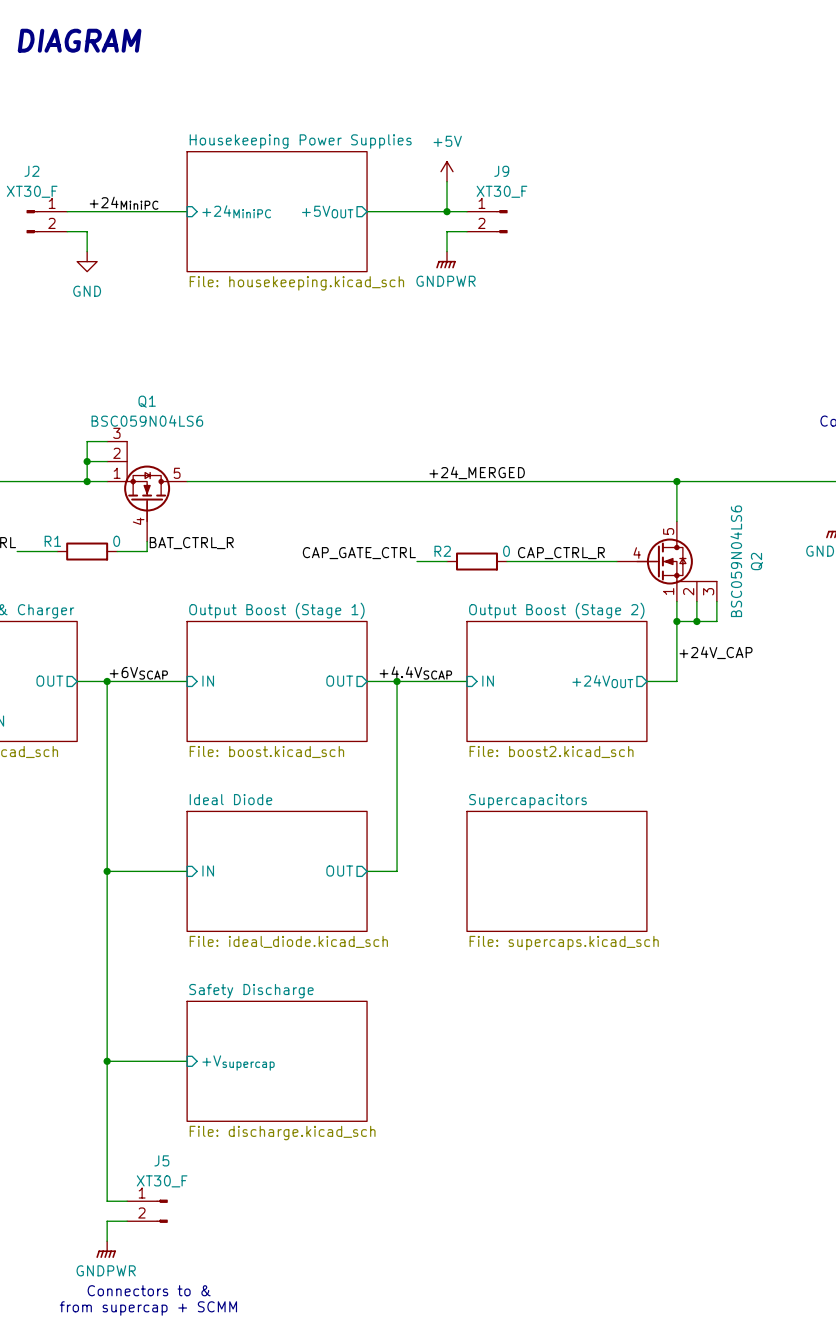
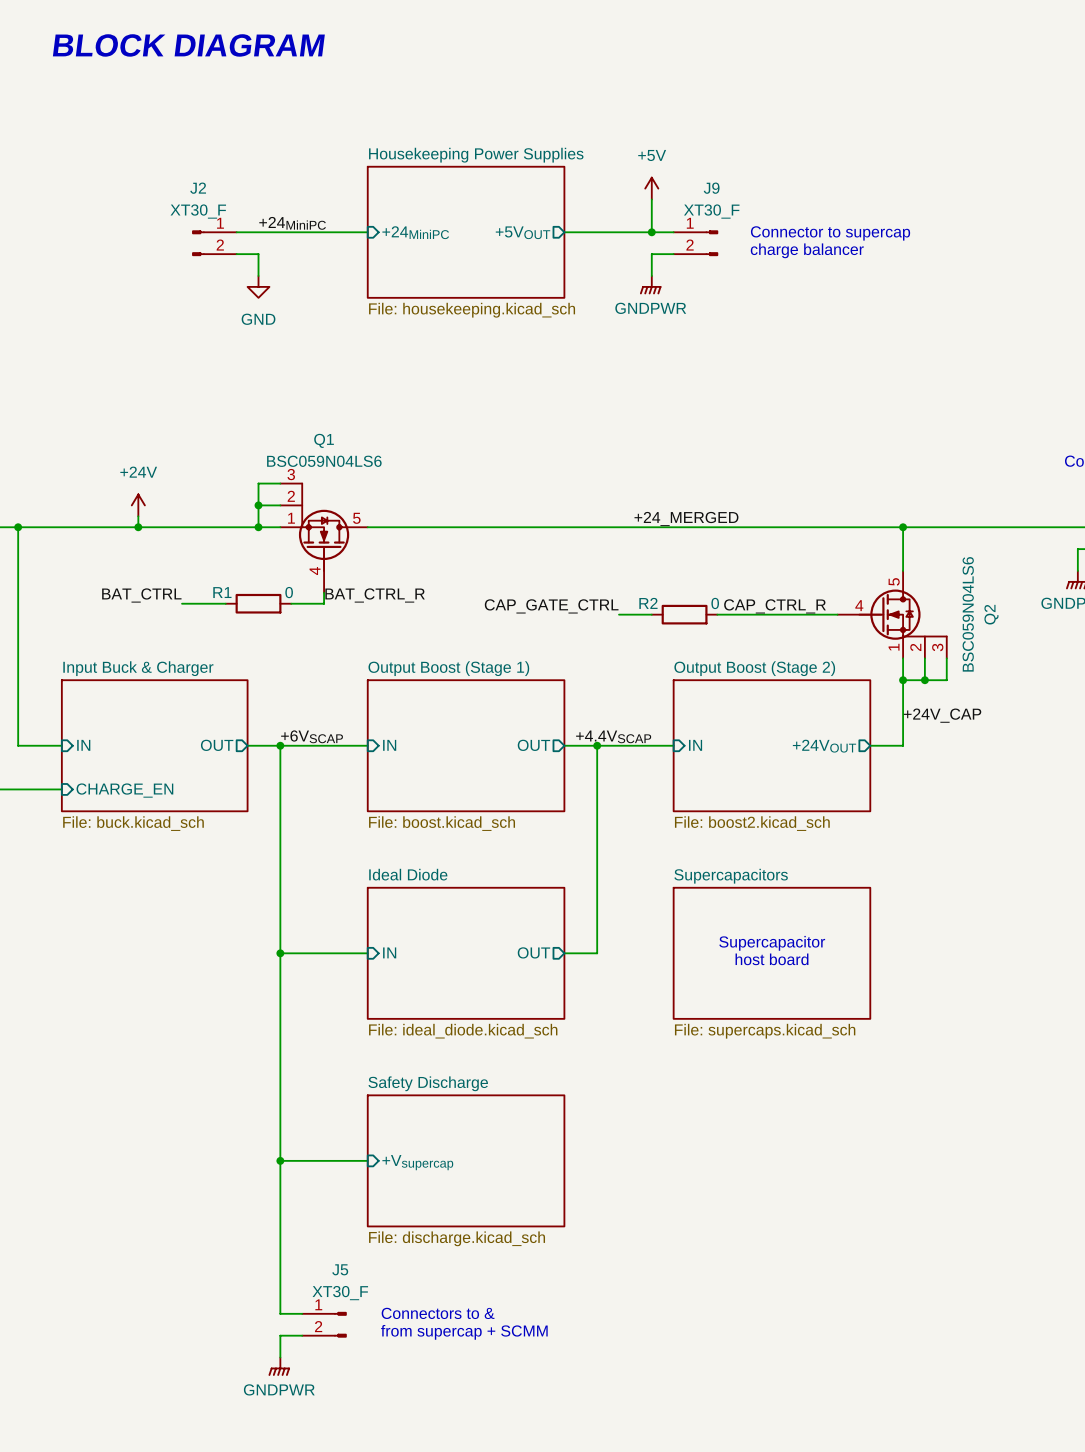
text: none -> Connector to supercap (830, 233)
text: none -> charge balancer (807, 250)
text: none -> Supercapacitor (772, 943)
text: none -> host board (772, 959)
text position: Connectors to & (149, 1290) -> Connectors to & (438, 1313)
text position: from supercap + SCMM (148, 1308) -> from supercap + SCMM (464, 1332)

